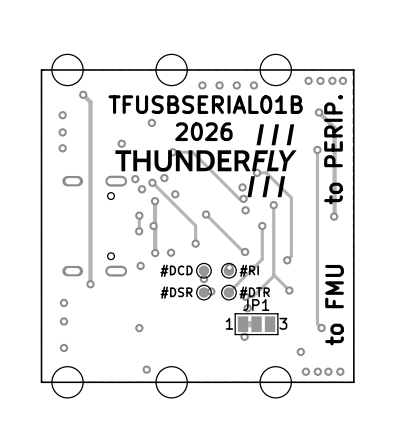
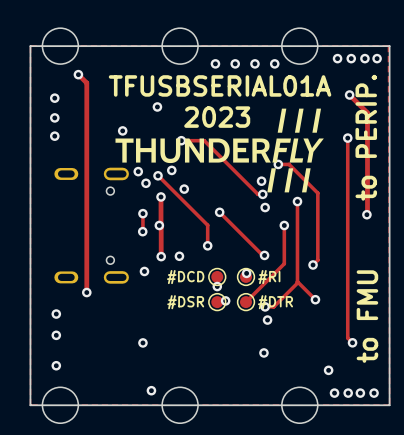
text: TFUSBSERIAL01B (205, 104) -> TFUSBSERIAL01A (220, 85)
text: 2026 (203, 131) -> 2023 (217, 117)
JP1: (256, 324) -> none

